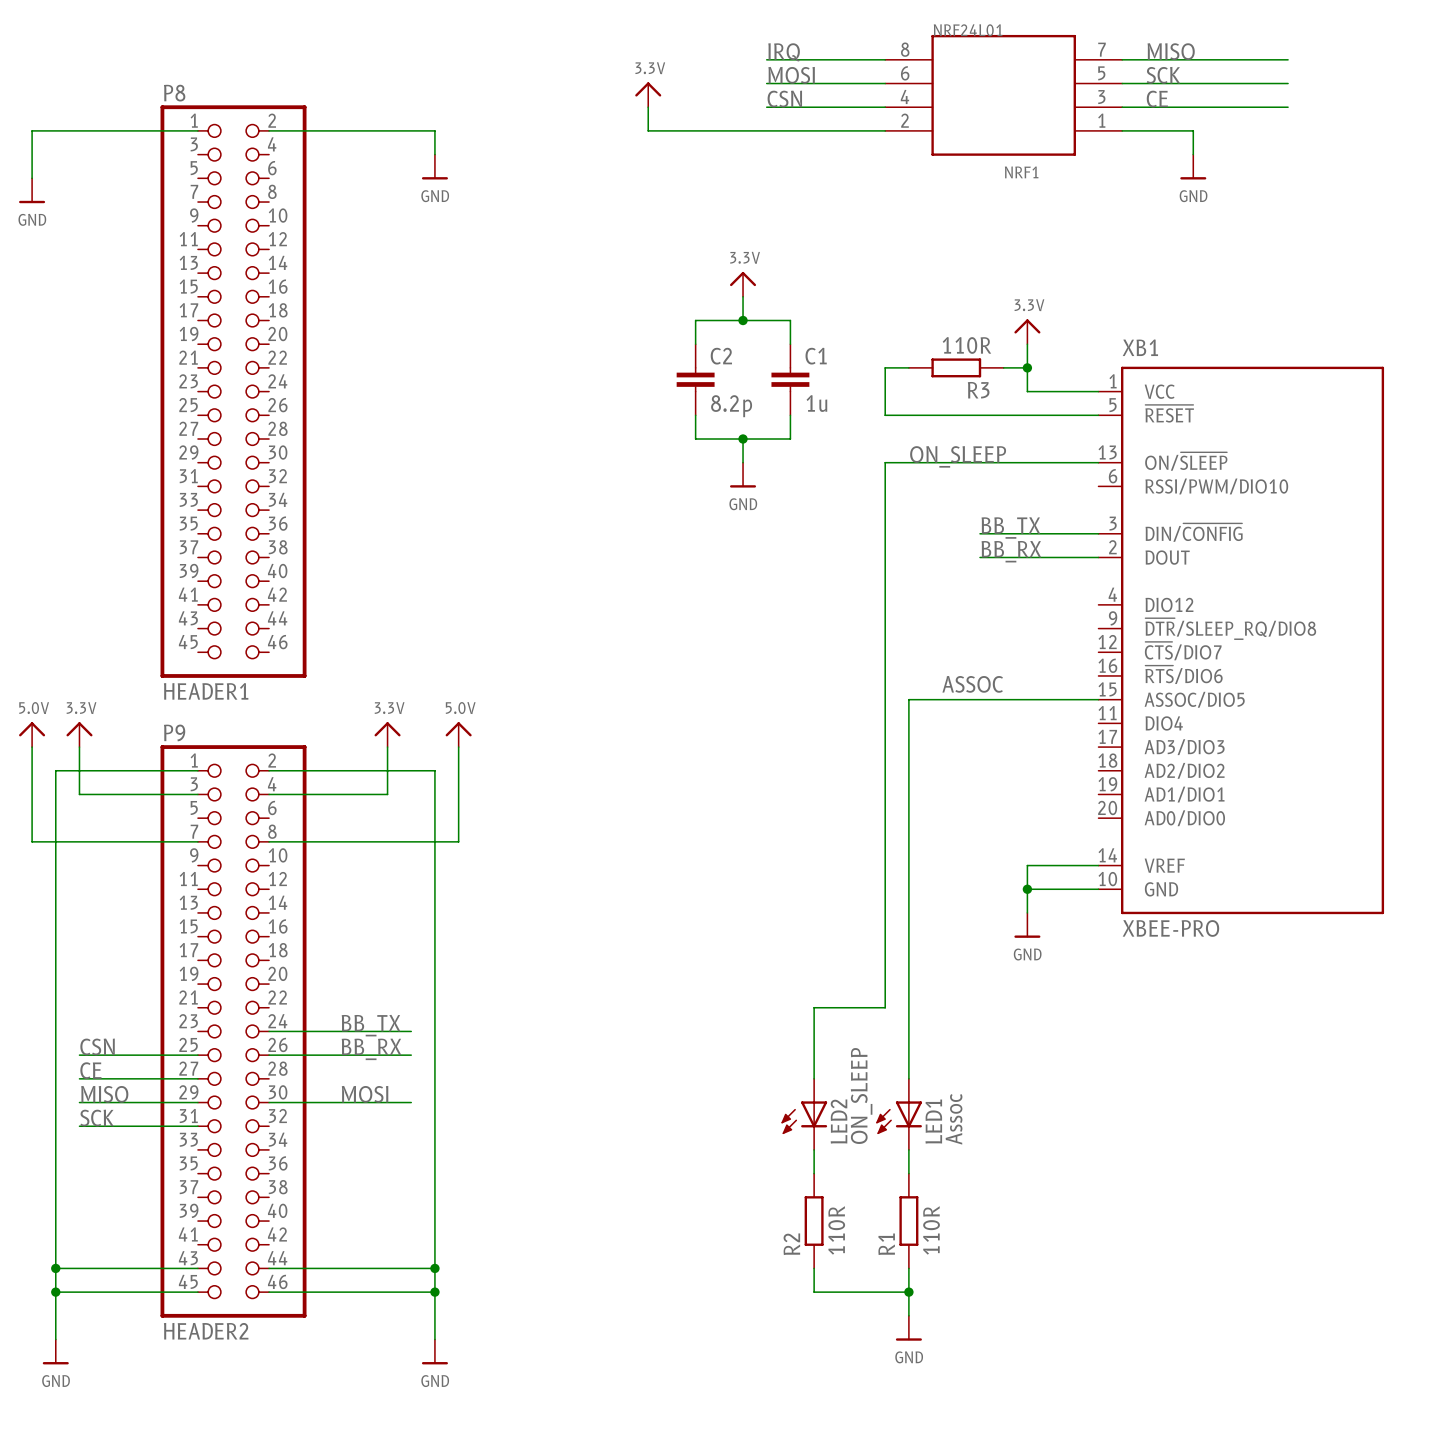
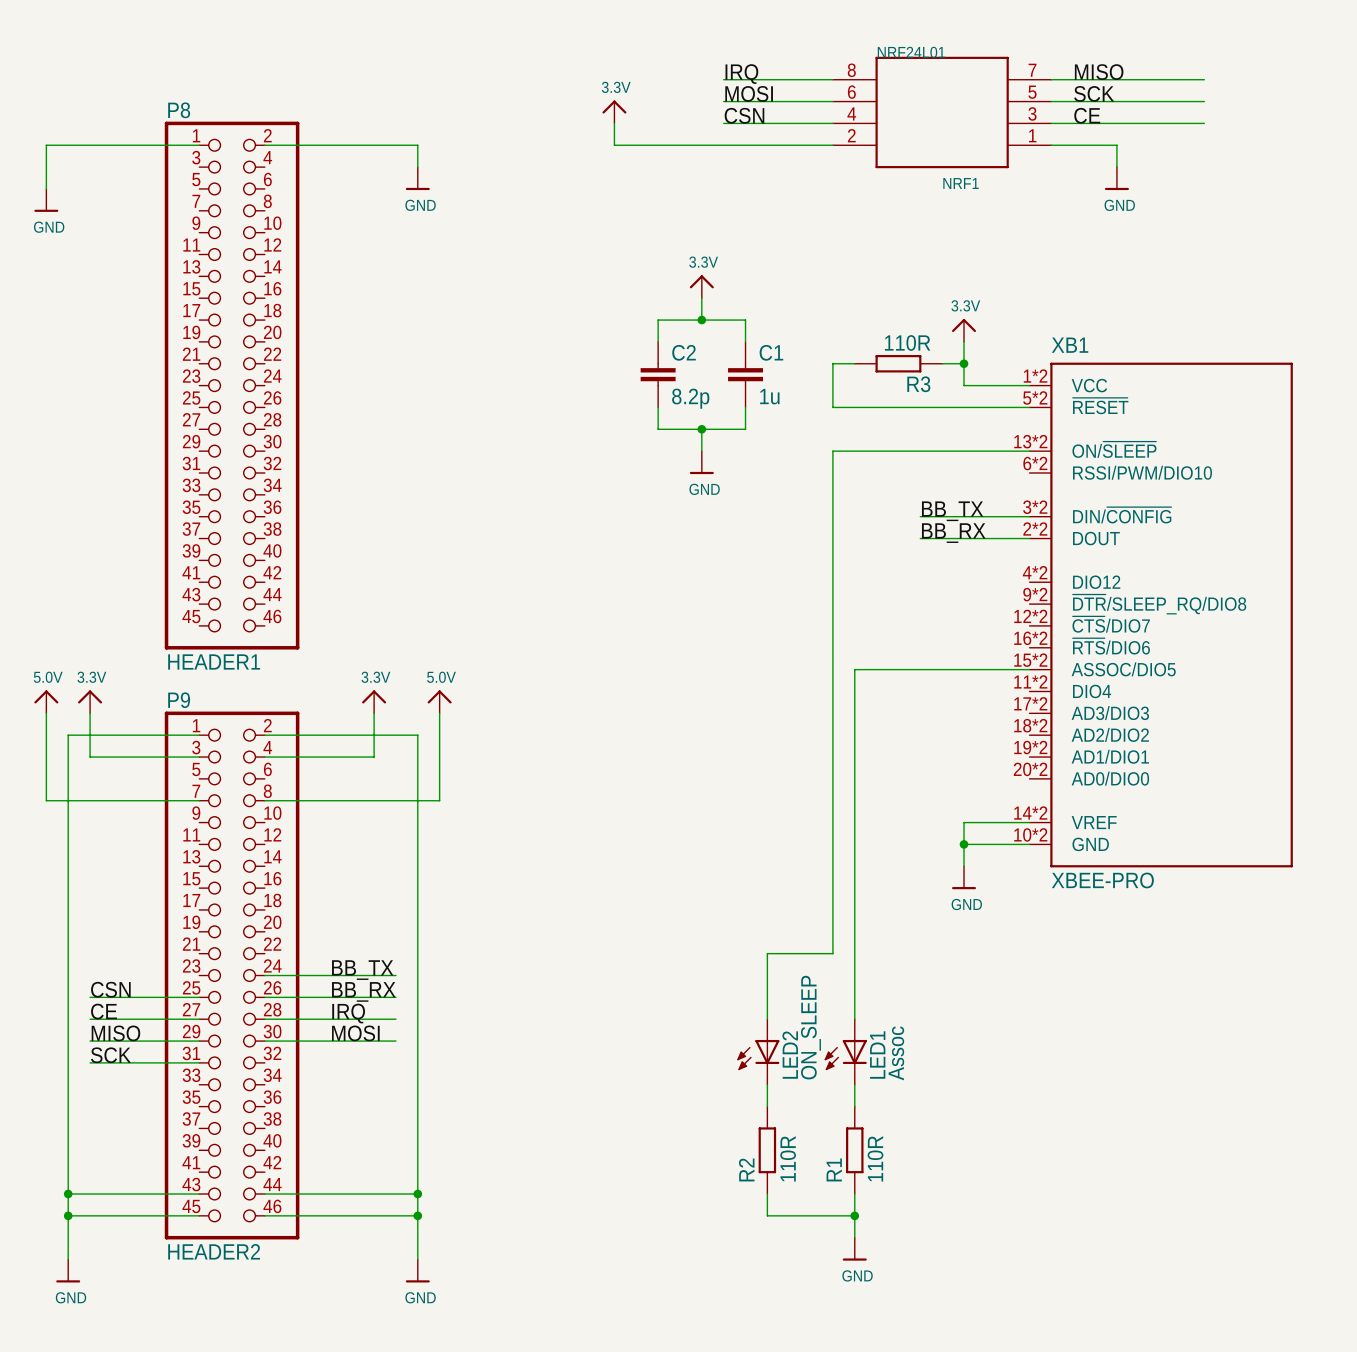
XB1 symbol: [1098, 366, 1385, 915] -> [1029, 362, 1293, 868]
label: ON_SLEEP (958, 456) -> none
label: ASSOC (972, 684) -> none
label: none -> IRQ (348, 1013)
wire: none -> (264, 1019) (395, 1019)

